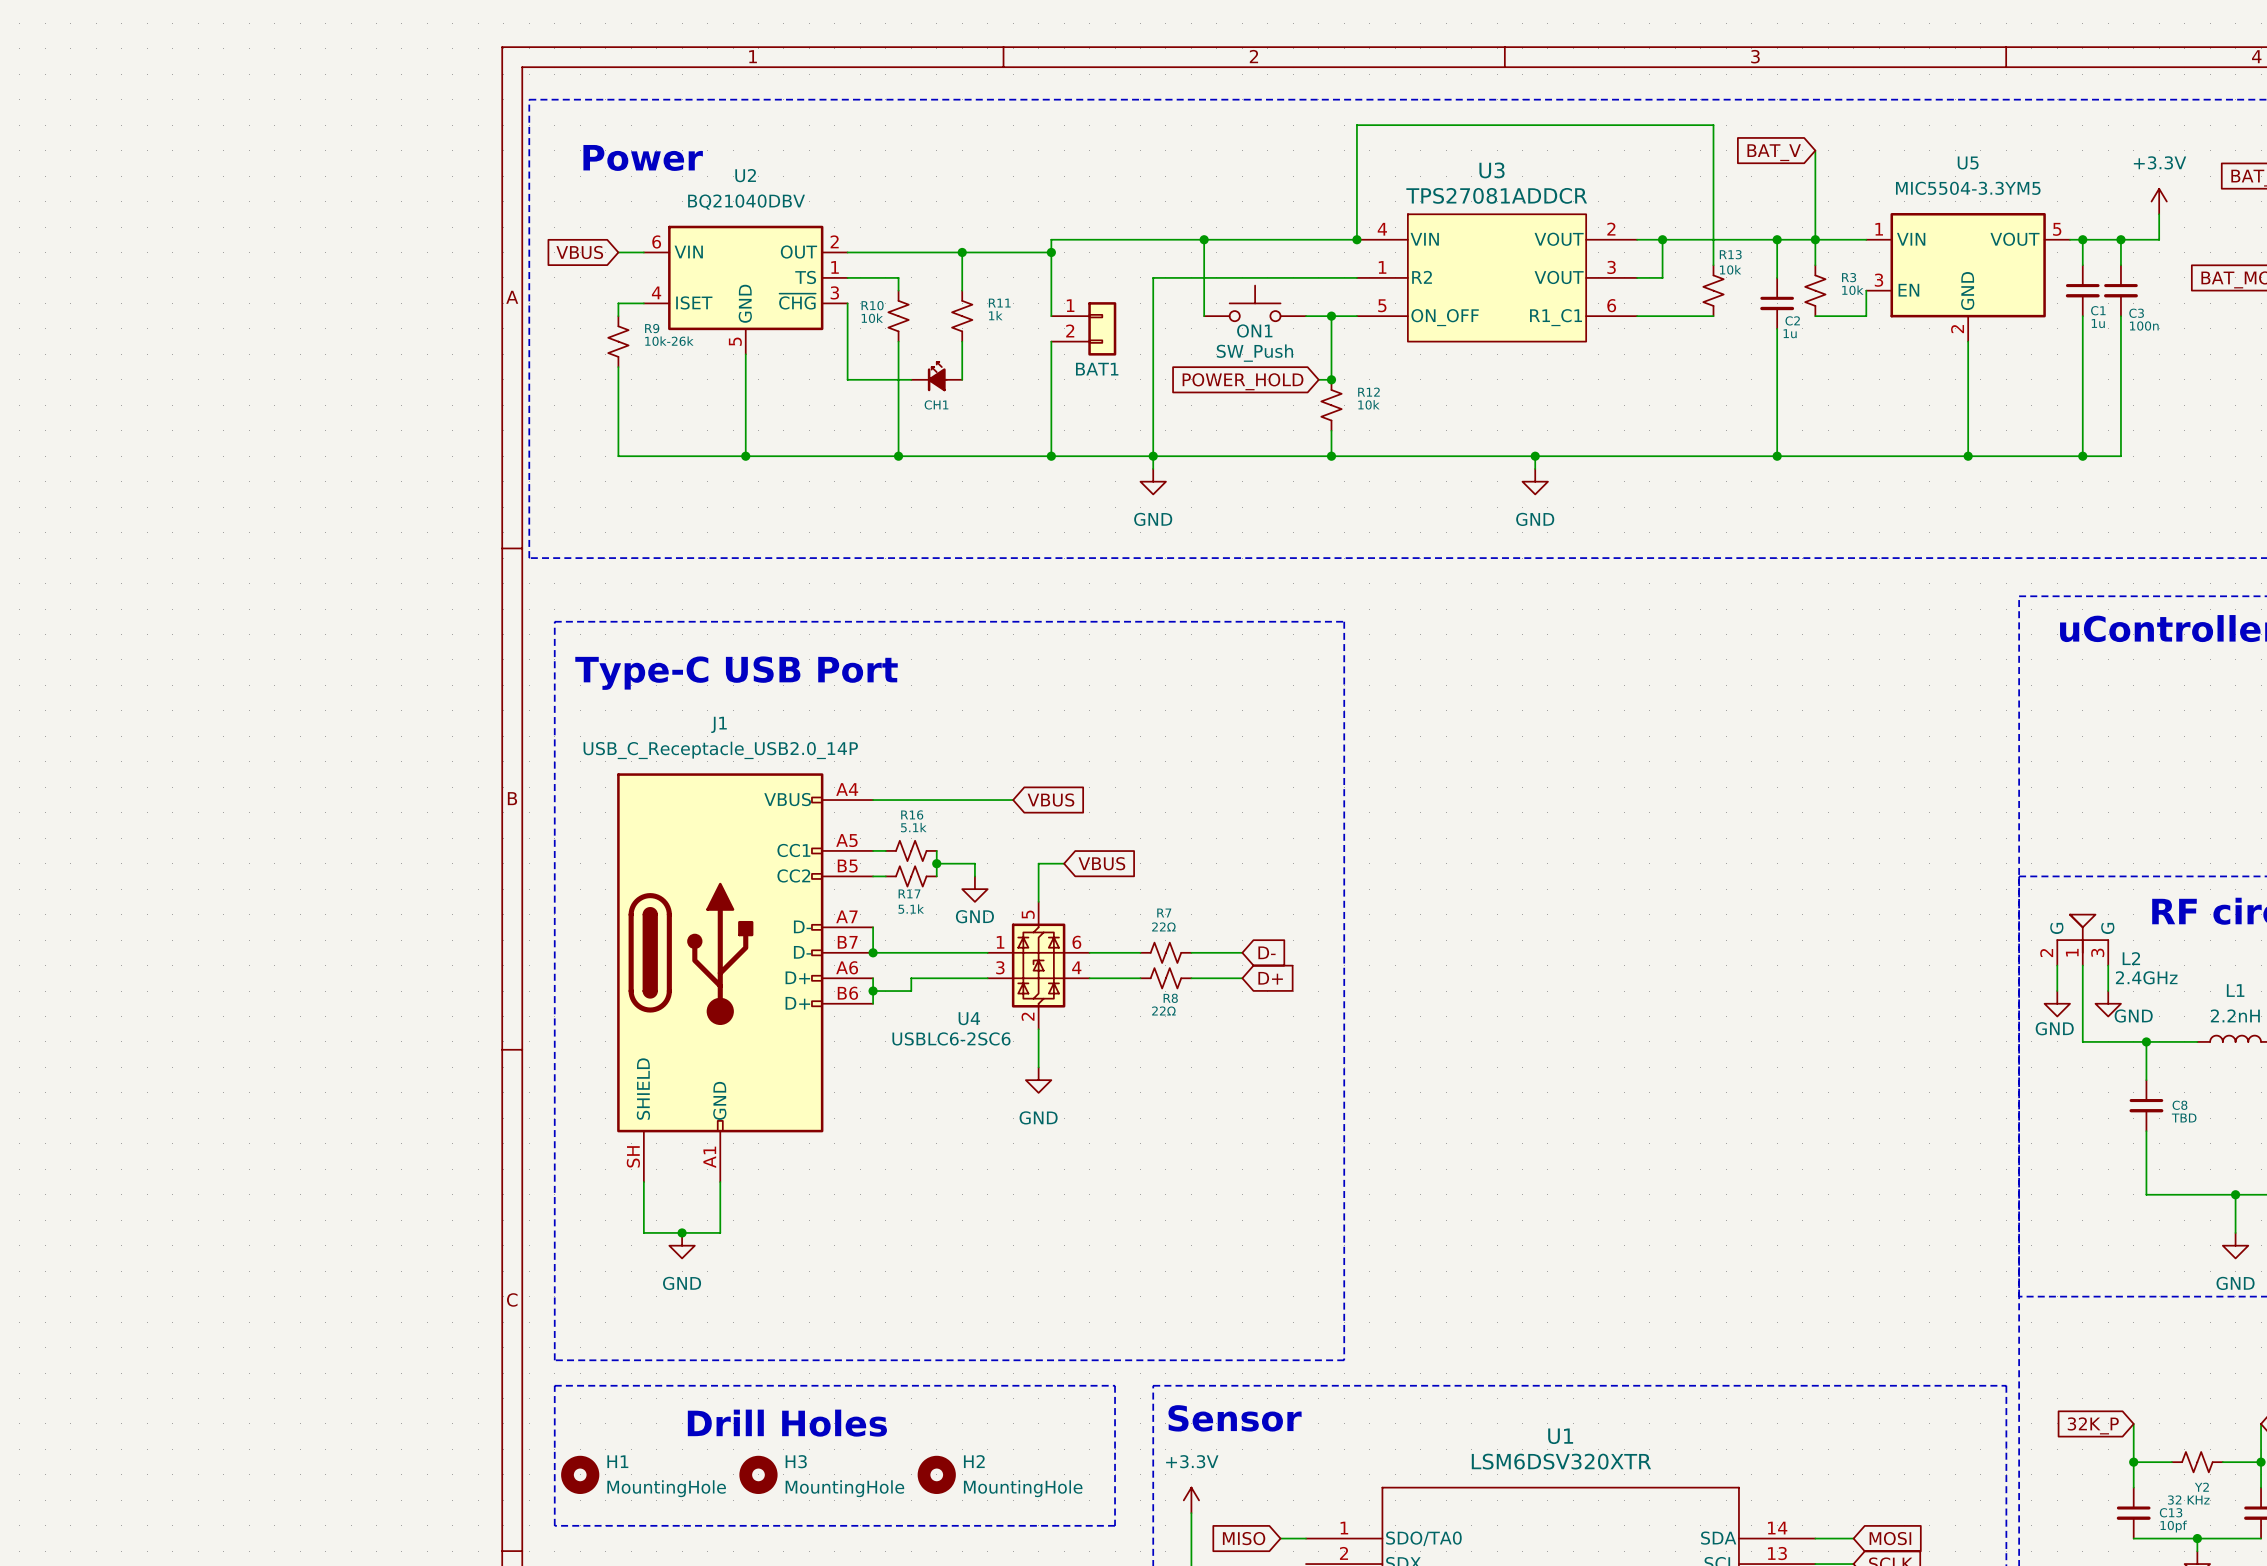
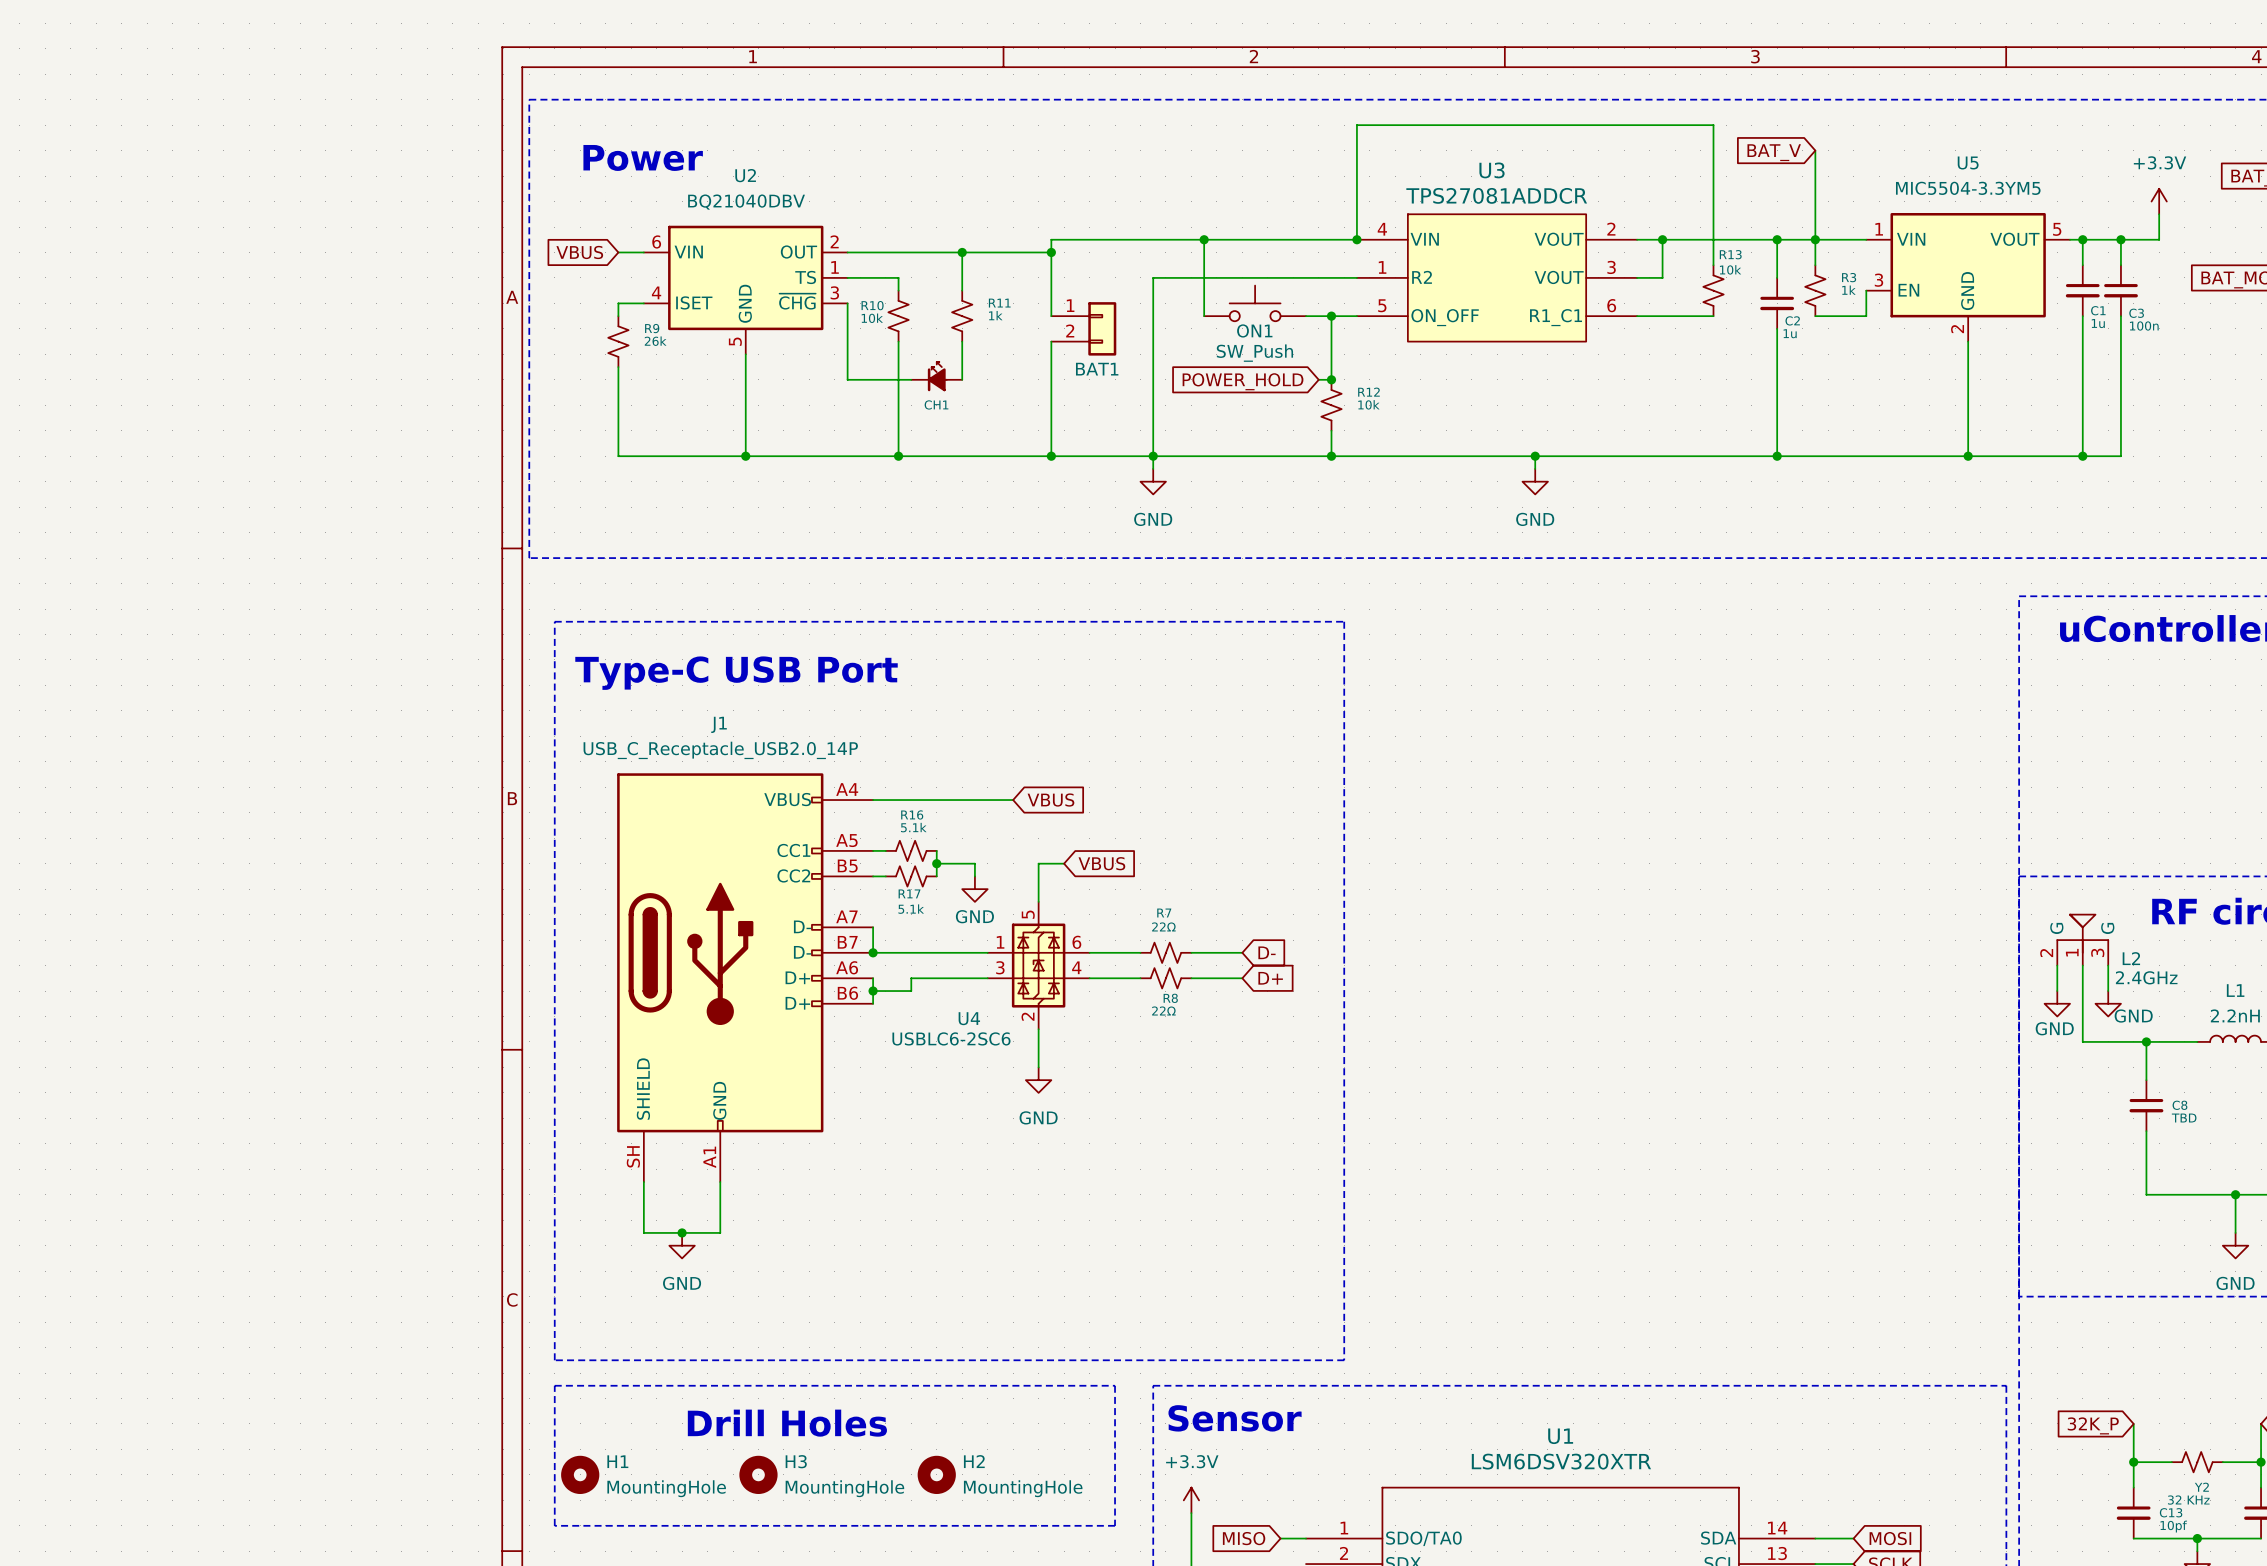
R3 value: 10k (1852, 290) -> 1k (1848, 290)
R9 value: 10k-26k (669, 341) -> 26k (655, 341)

